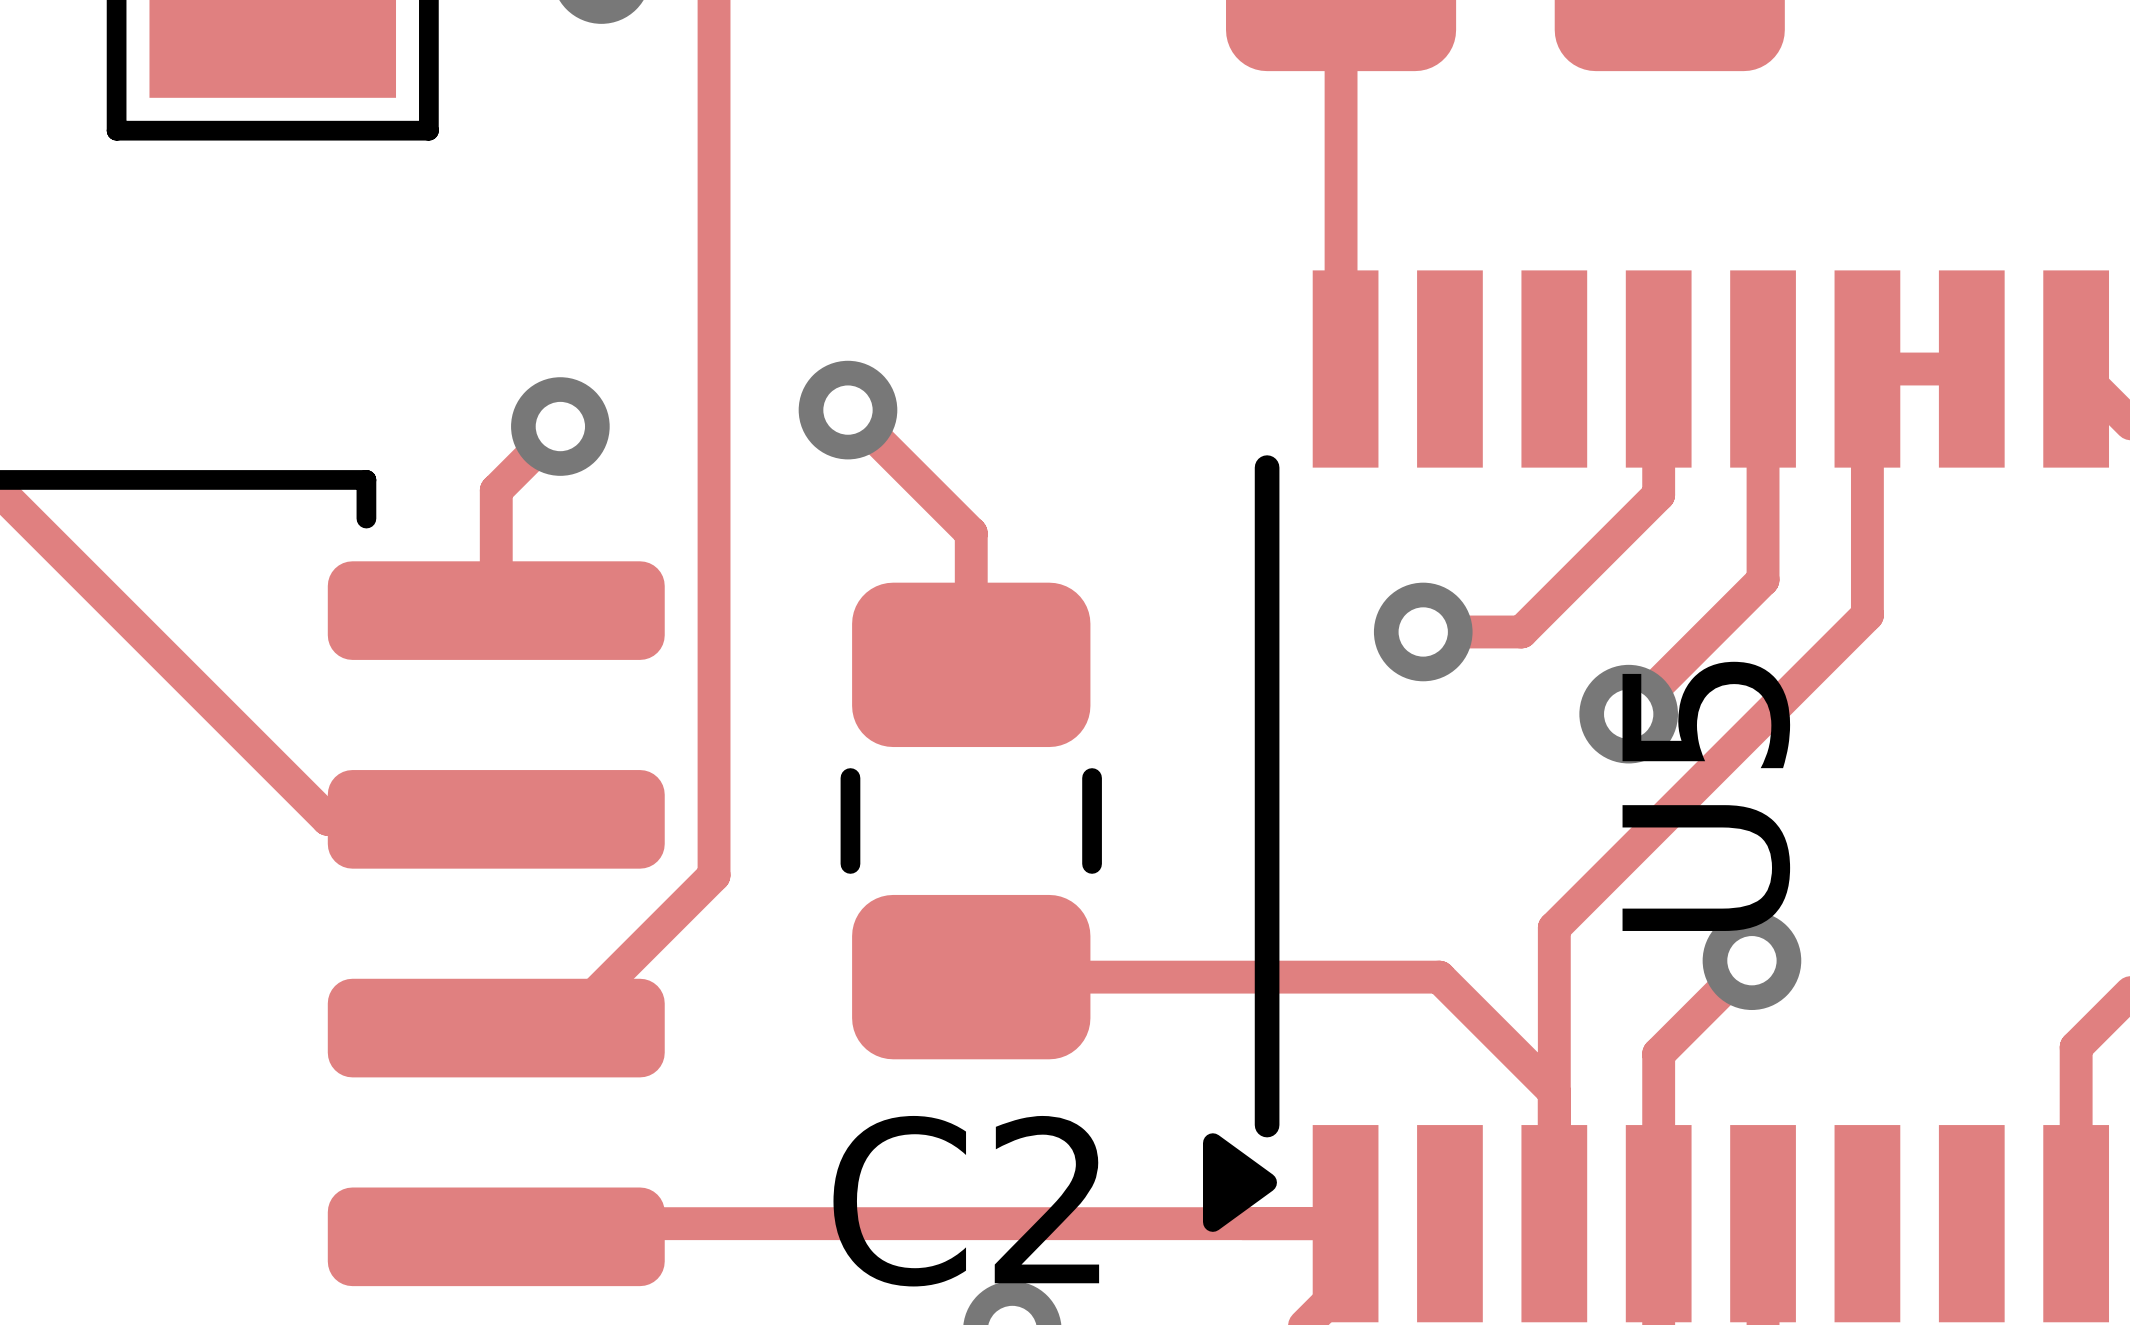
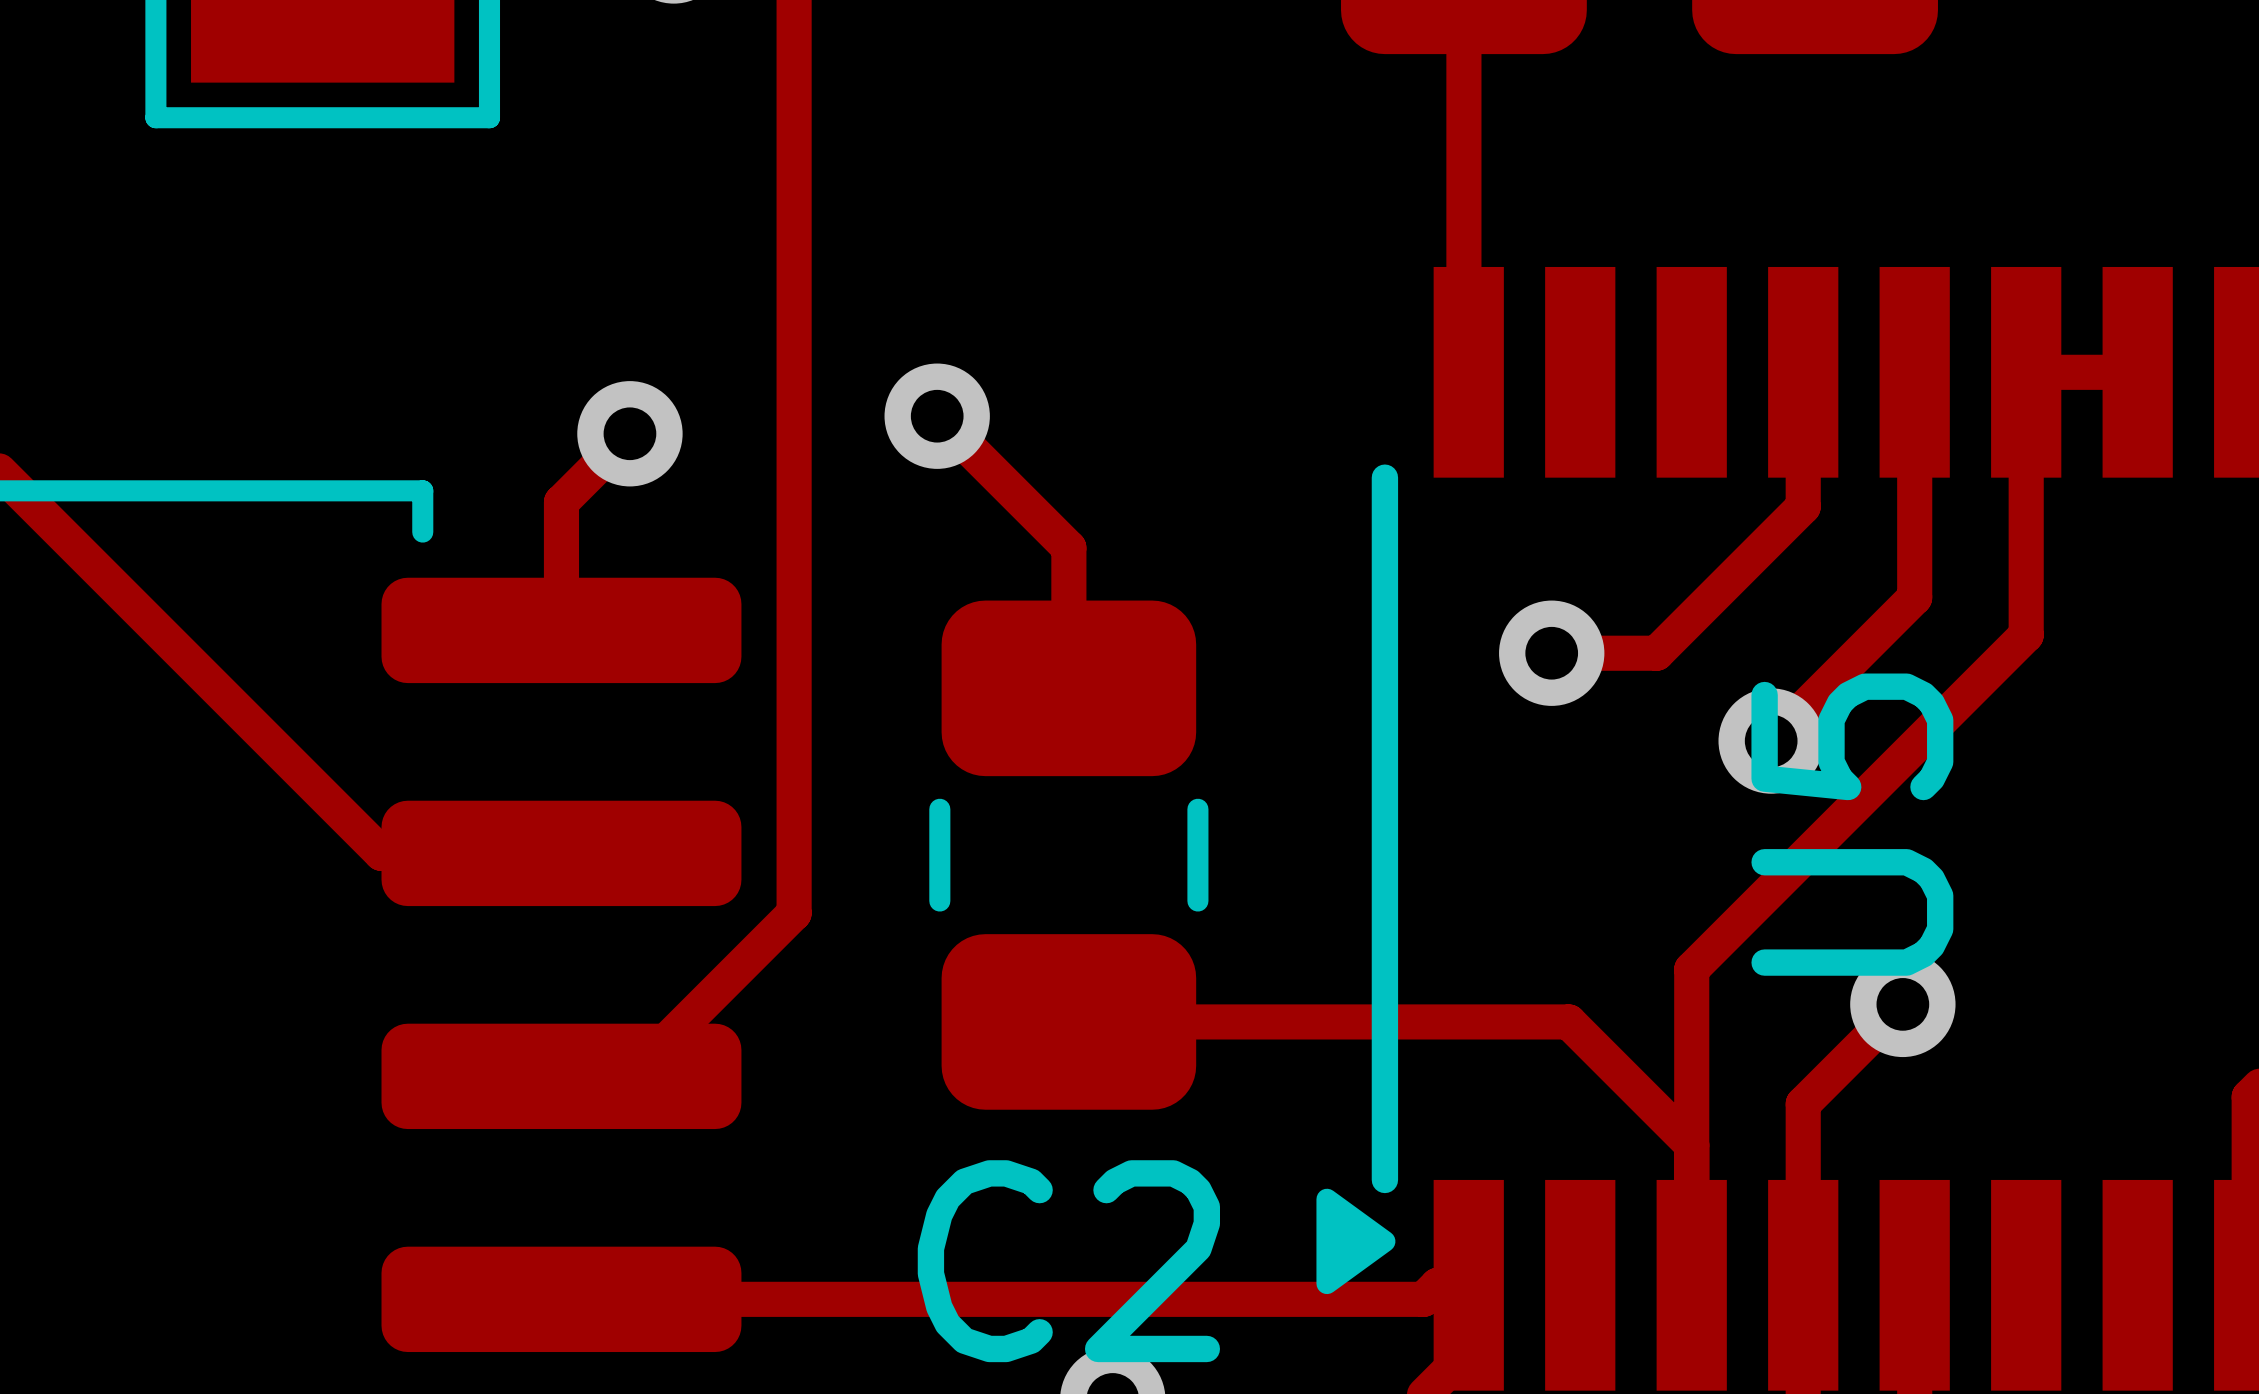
track: (509, 1223) (1316, 1223) -> (561, 1299) (1423, 1299) (1437, 1285)

